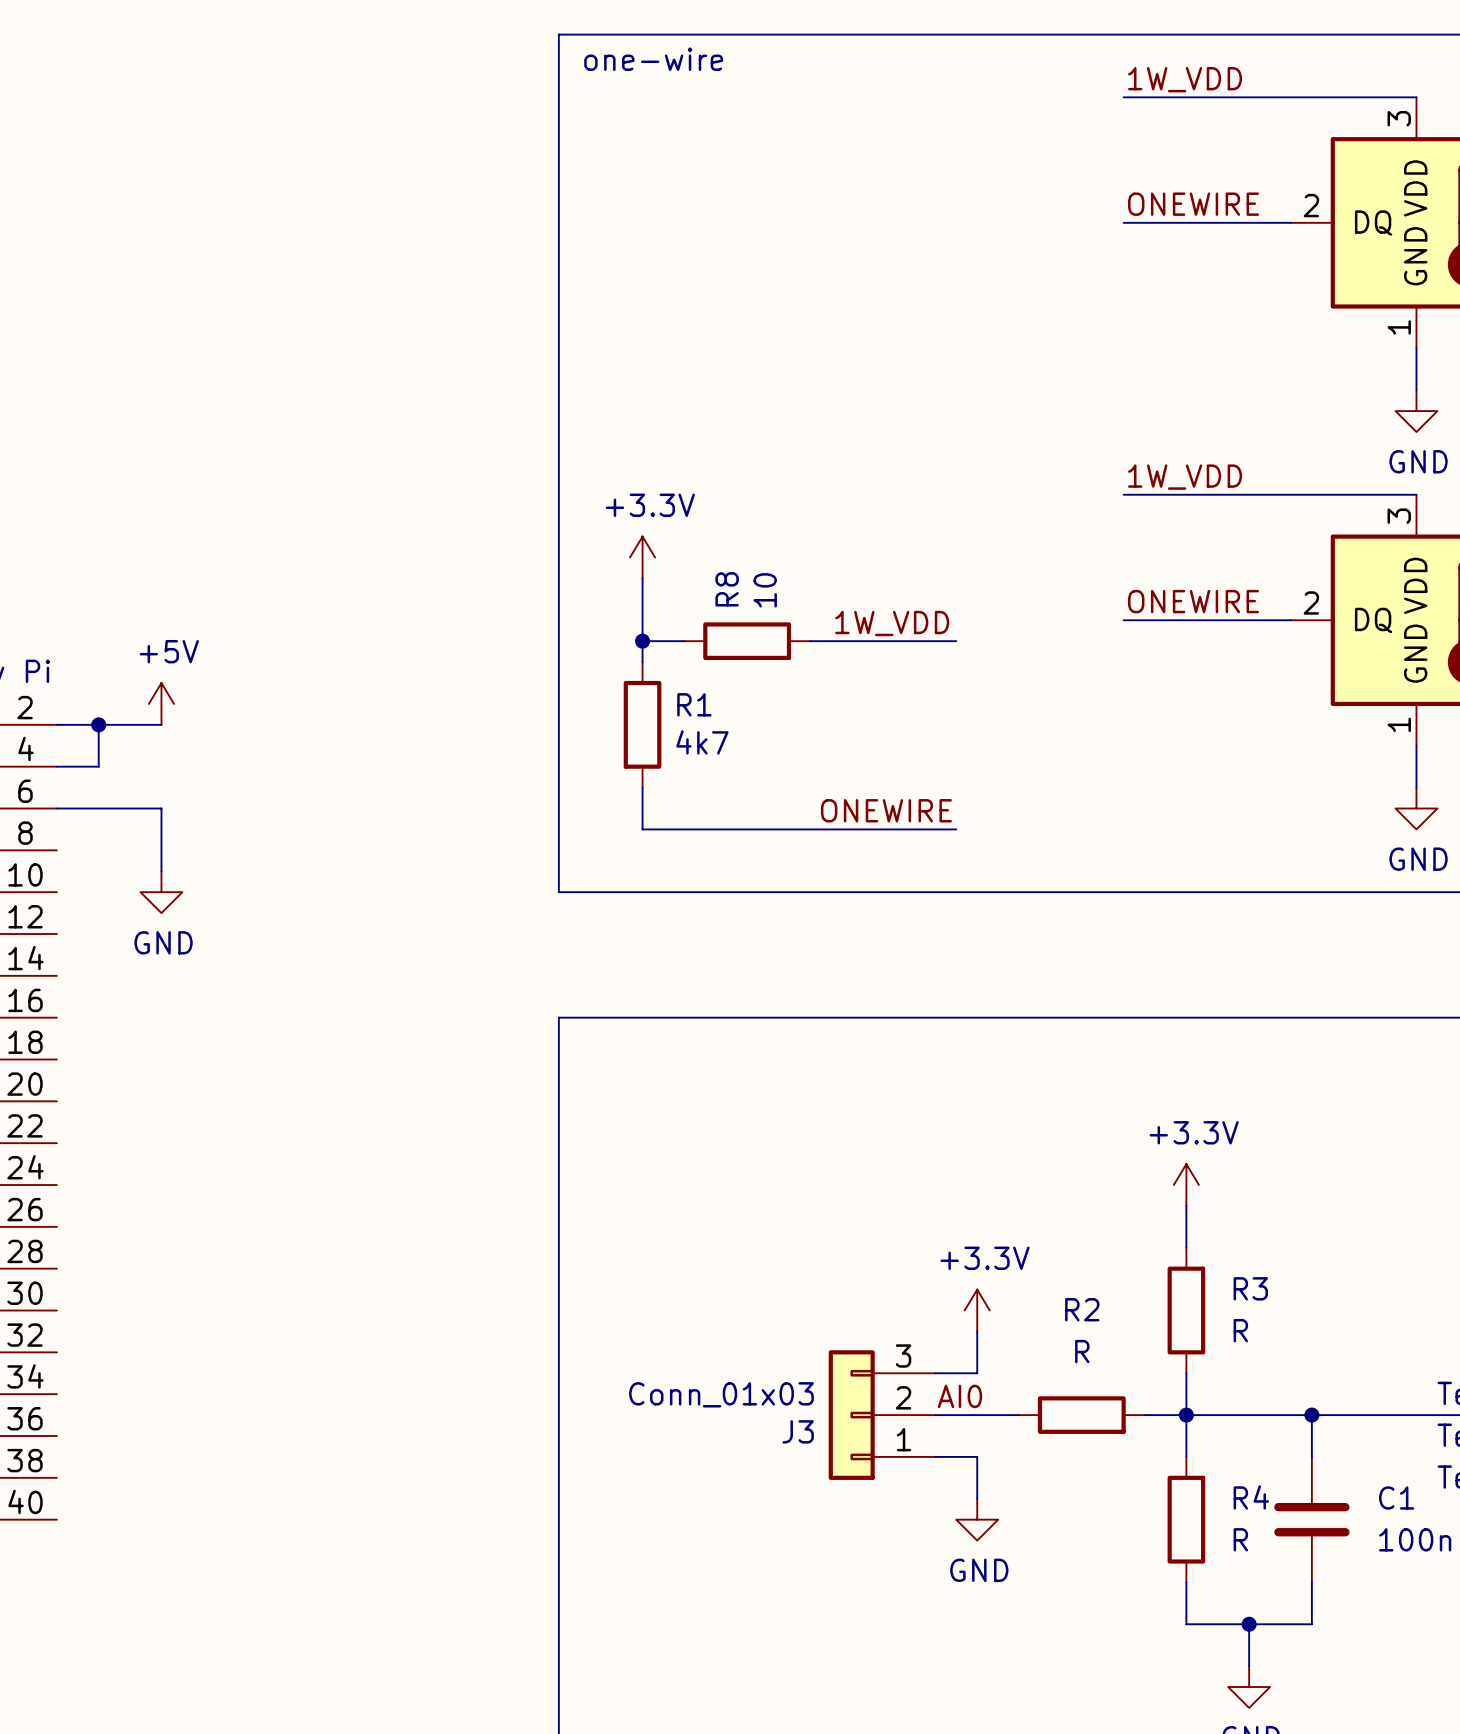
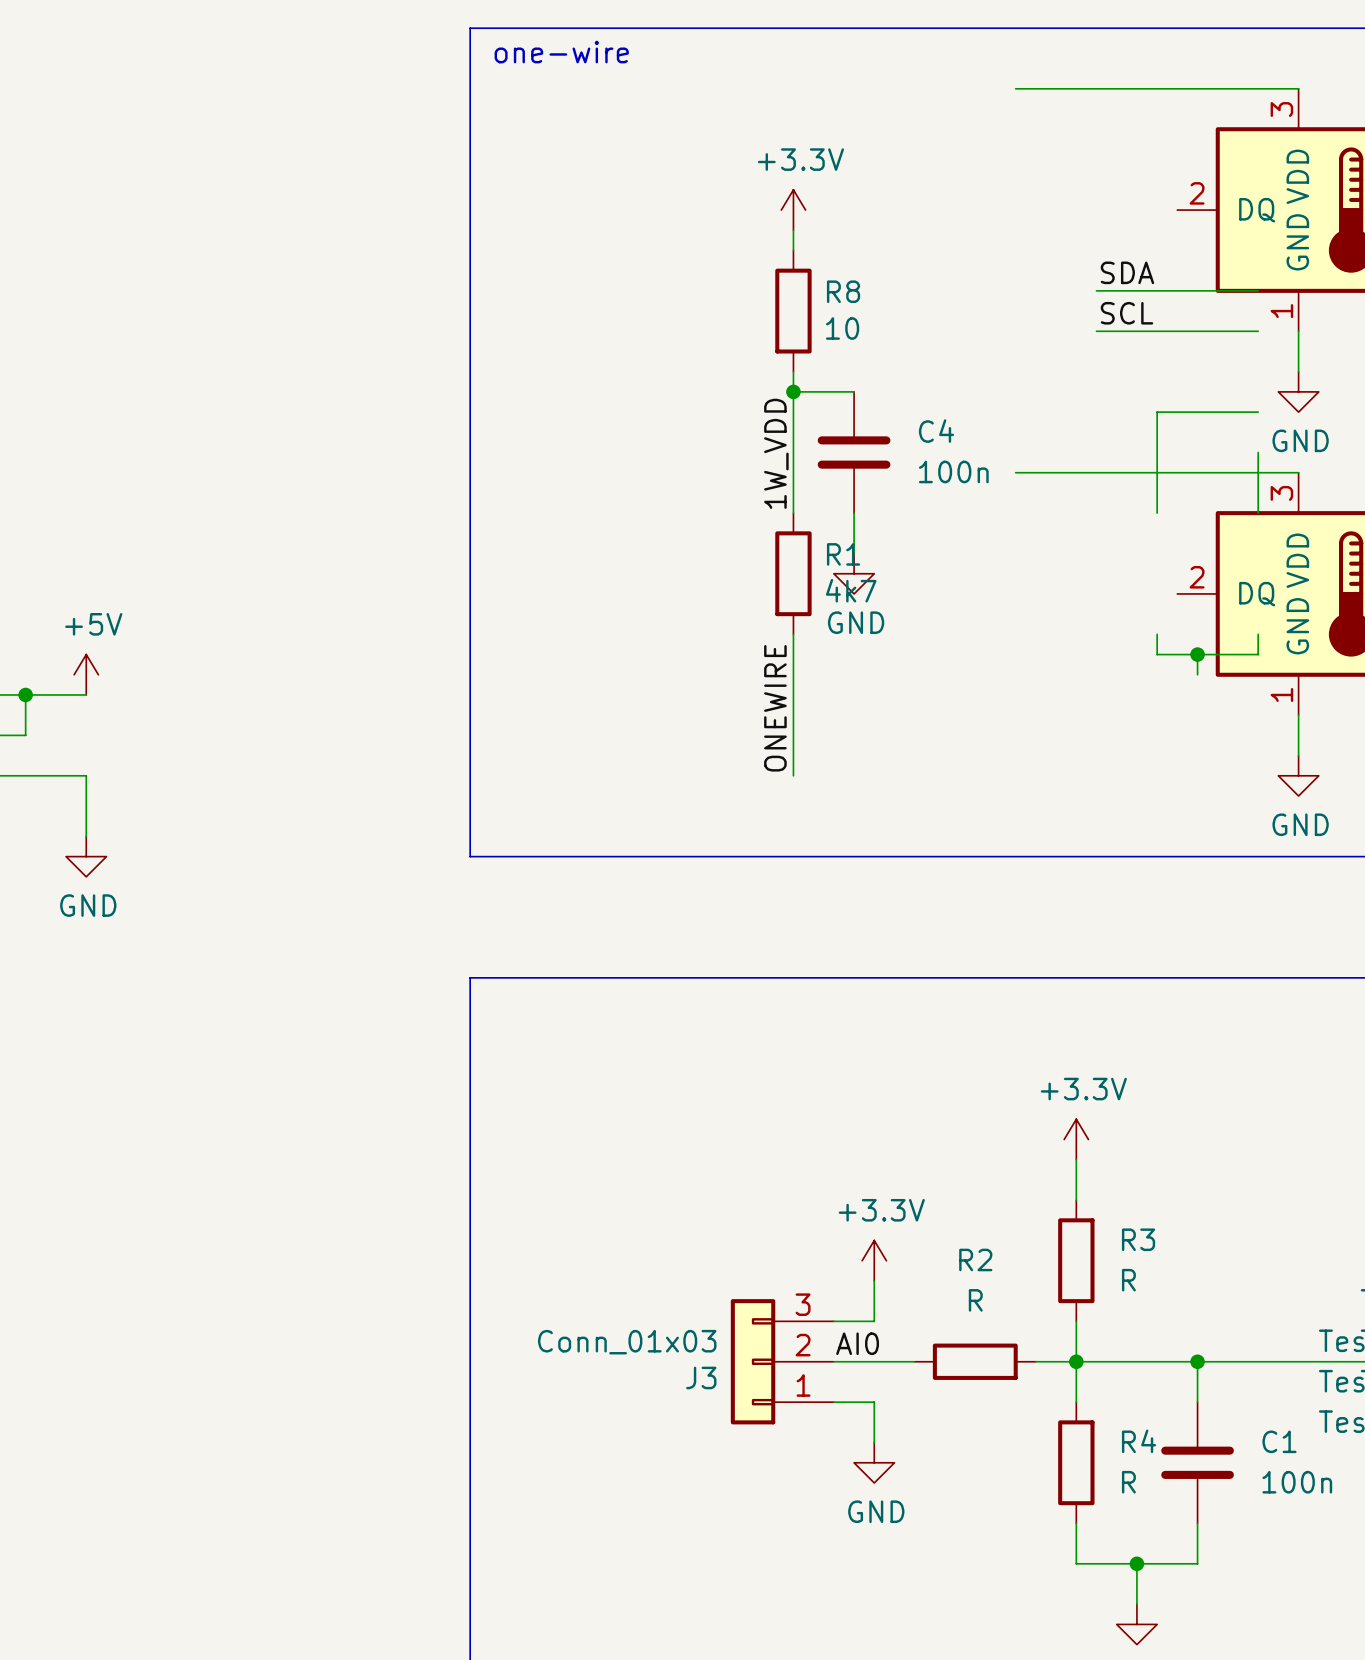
label: 1W_VDD (1185, 79) -> none
label: ONEWIRE (1193, 204) -> none
power symbol: none -> +3.3V (793, 210)
wire: (1123, 222) (1290, 222) -> (1096, 290) (1258, 290)
wire: none -> (793, 230) (793, 250)
label: none -> SDA (1127, 272)
label: none -> SCL (1126, 313)
wire: none -> (793, 371) (793, 513)
wire: none -> (793, 391) (854, 391)
junction: none -> (793, 391)
wire: none -> (1258, 412) (1157, 412) (1157, 513)
C4: none -> 100n (854, 452)
wire: none -> (1258, 452) (1258, 513)
label: 1W_VDD (1185, 477) -> none
wire: none -> (854, 513) (854, 553)
power symbol: +3.3V (642, 557) -> none
wire: (642, 578) (642, 662) -> none
power symbol: none -> GND (854, 573)
label: ONEWIRE (1193, 601) -> none
wire: (1123, 620) (1290, 620) -> (1096, 331) (1258, 331)
label rotation: 0° (892, 623) -> 90° counterclockwise (776, 453)
label position: 1W_VDD (892, 623) -> 1W_VDD (776, 453)
wire: (642, 641) (684, 641) -> none
junction: (642, 641) -> none
R8 rotation: 0° (747, 641) -> 90° clockwise (793, 311)
R8 position: (747, 641) -> (793, 311)
wire: (809, 641) (956, 641) -> none
wire: none -> (793, 634) (793, 775)
wire: none -> (1157, 634) (1157, 654) (1258, 654) (1258, 634)
wire: none -> (1197, 654) (1197, 674)
junction: none -> (1197, 654)
R1 position: (642, 724) -> (793, 573)
wire: (642, 787) (642, 829) (956, 829) -> none
label rotation: 0° (886, 810) -> 90° counterclockwise (775, 708)

